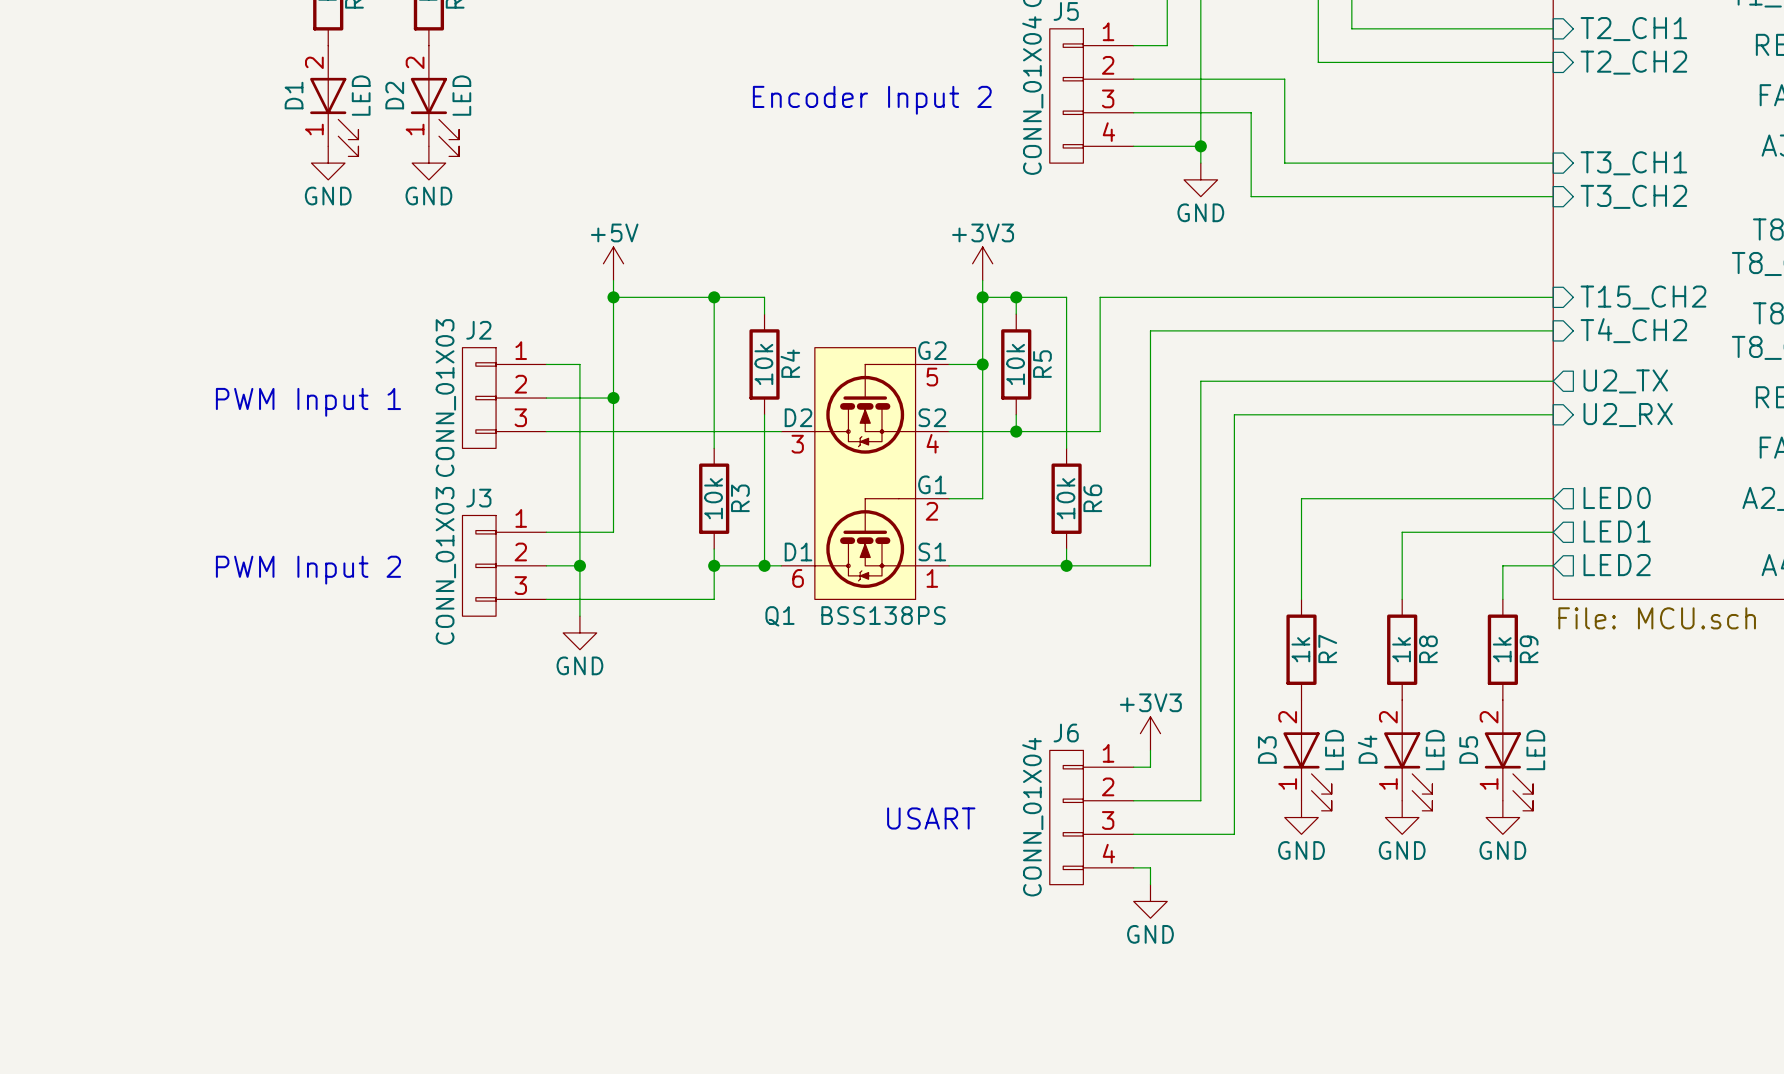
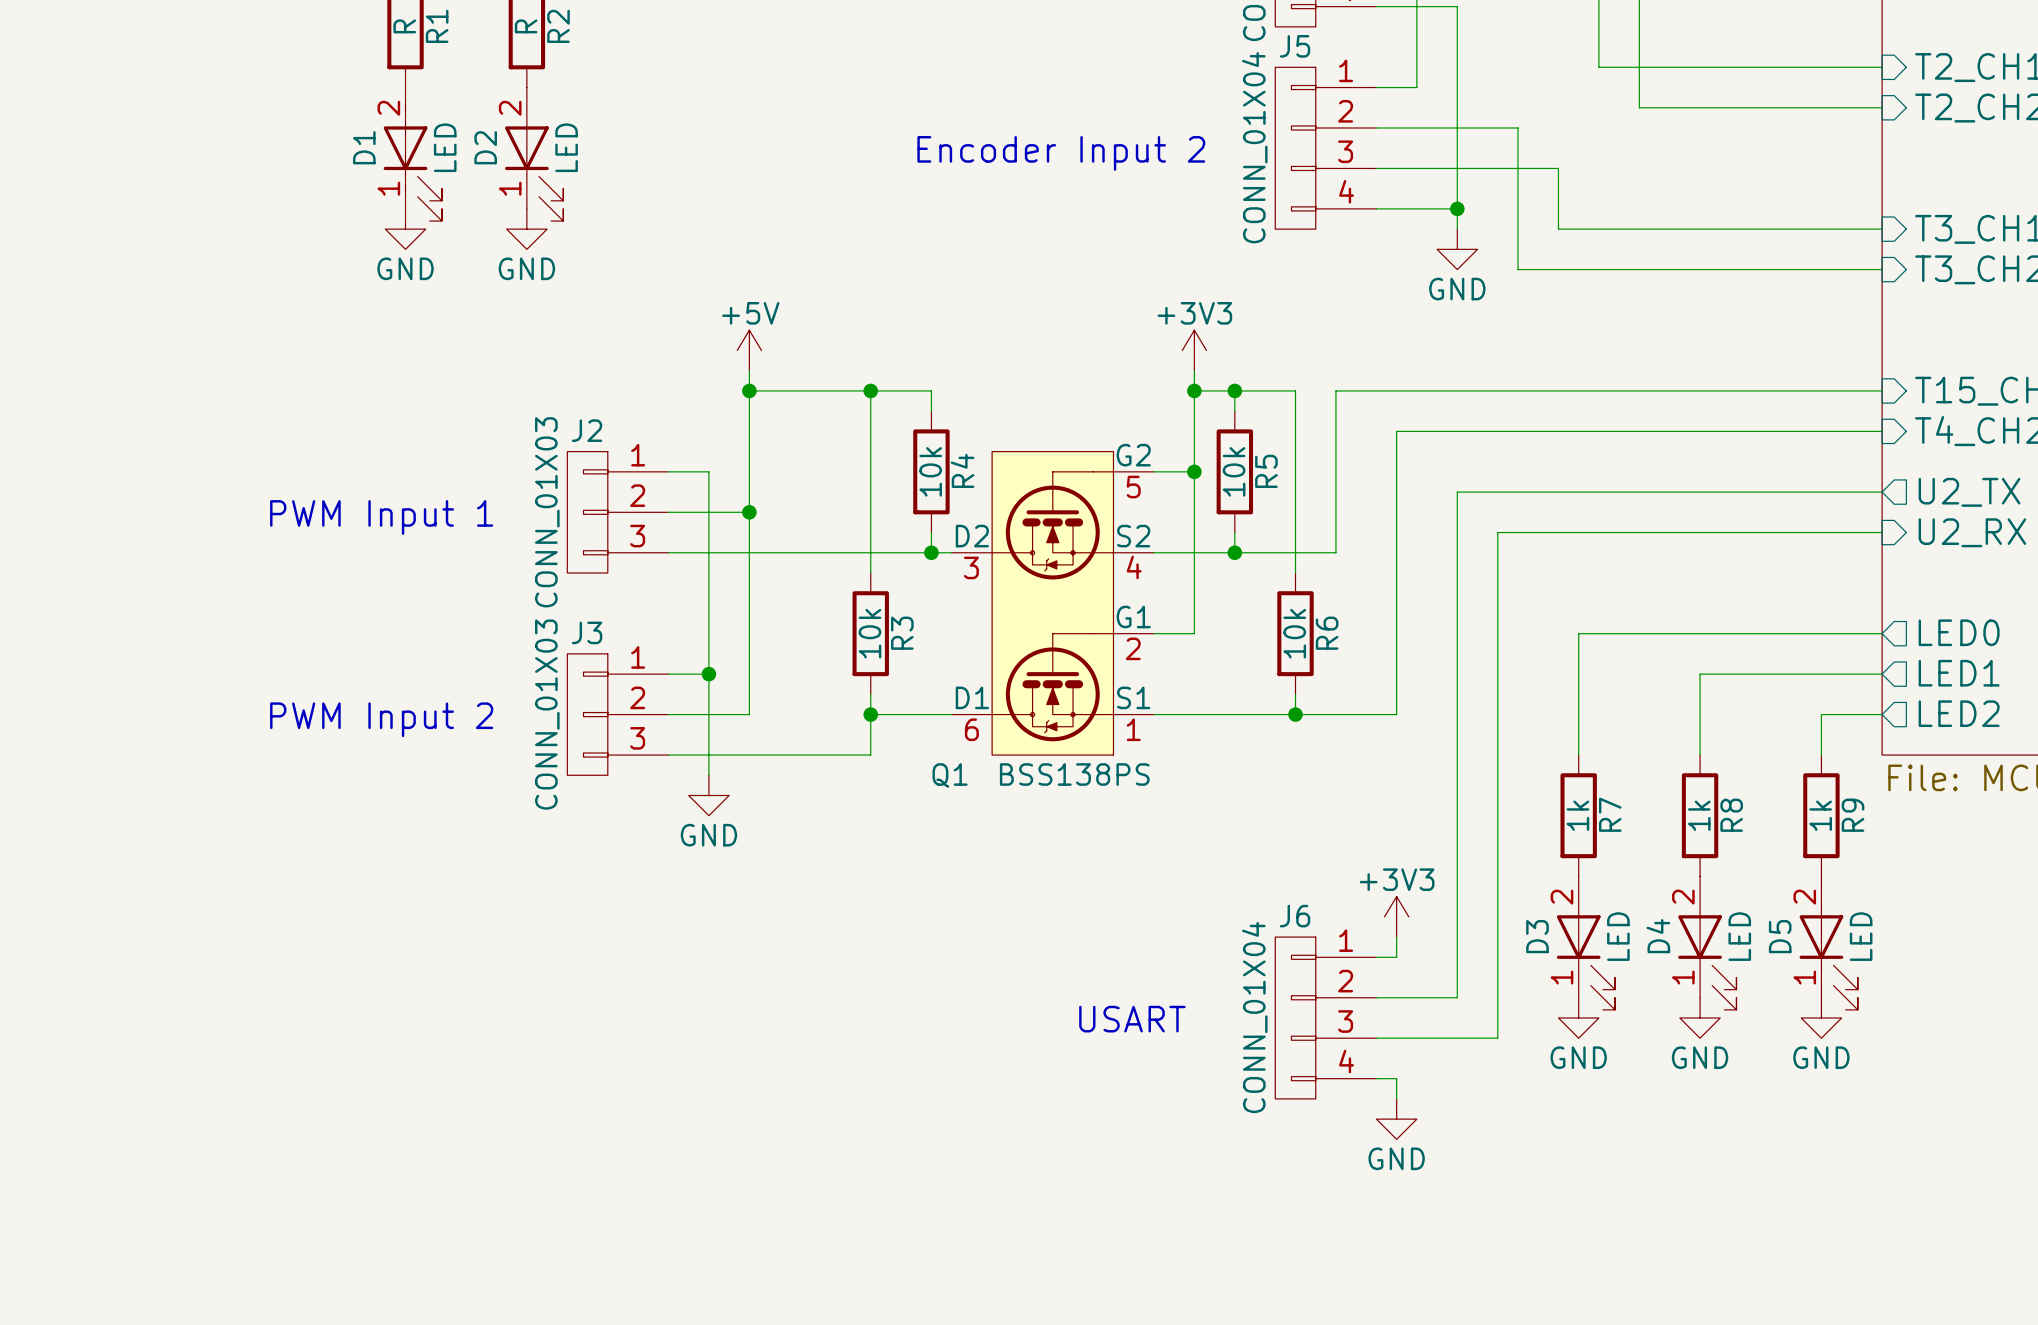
wire: (1318, 28) (1318, 62) (1351, 62) -> (1598, 67) (1639, 67) (1639, 107)
wire: (1251, 79) (1284, 79) (1284, 112) -> (1518, 127) (1518, 168) (1558, 168)
wire: (764, 431) (764, 565) -> none
junction: none -> (931, 552)
wire: (579, 532) (613, 532) -> (708, 714) (749, 714) (749, 674)
junction position: (579, 565) -> (708, 674)
junction: (764, 565) -> none

